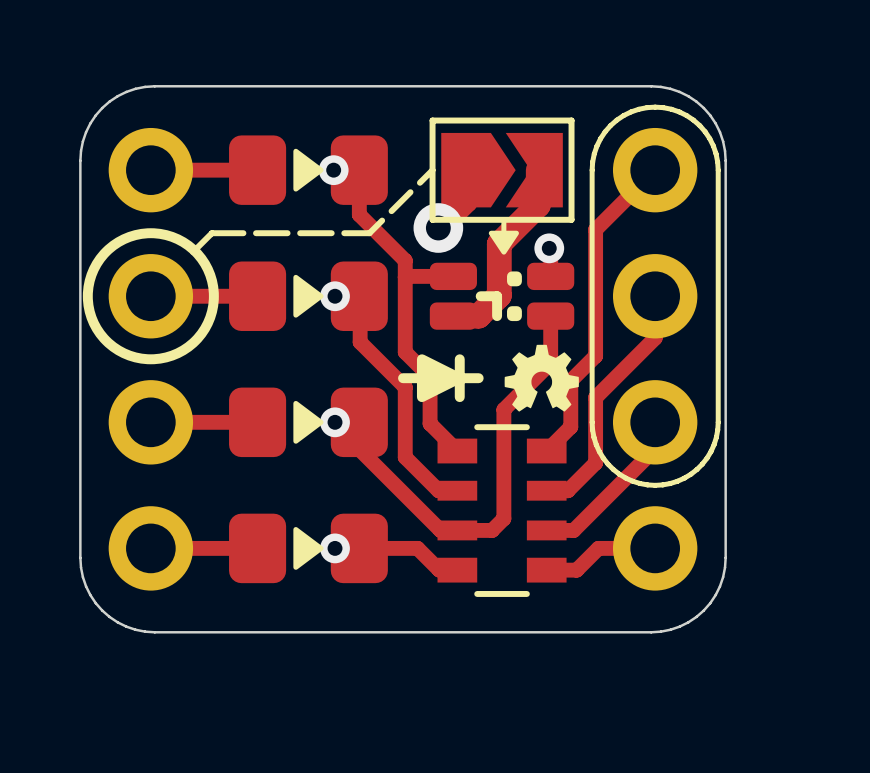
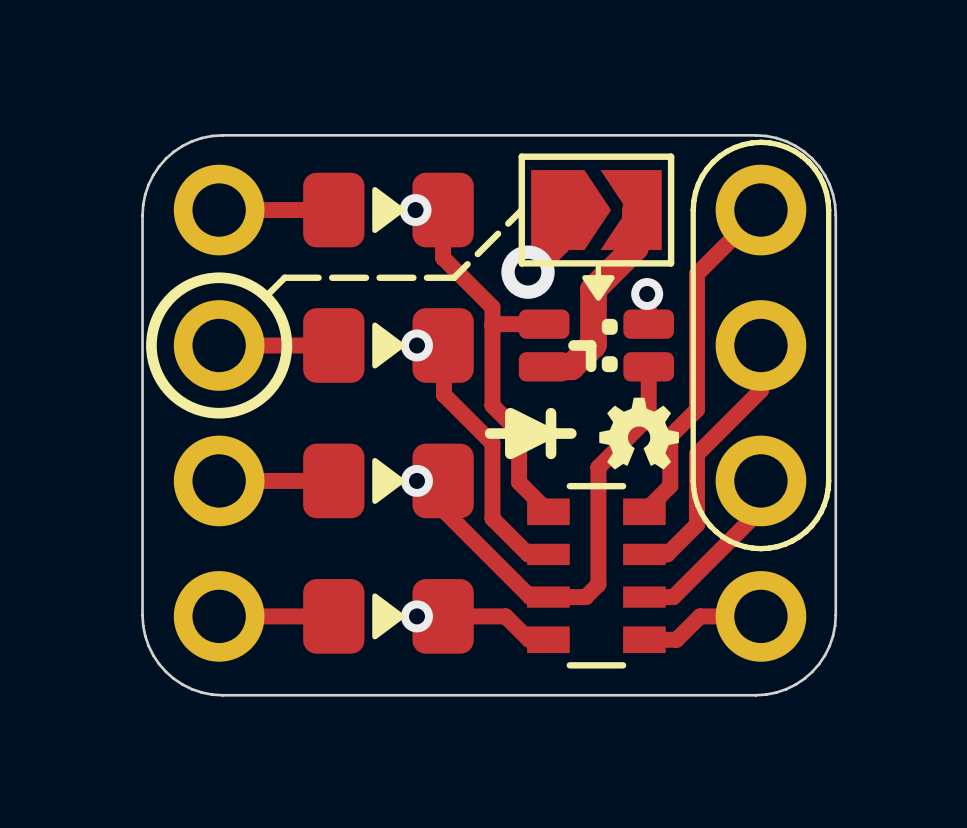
board edge: (154, 86) (135, 88) (109, 101) (90, 123) (81, 151) (80, 557) (86, 586) (102, 610) (126, 626) (154, 632) (651, 632) (679, 626) (703, 610) (719, 586) (725, 557) (725, 160) (719, 132) (703, 108) (679, 91) (651, 86) (154, 86) -> (222, 135) (201, 138) (173, 151) (153, 175) (143, 204) (142, 615) (148, 645) (165, 671) (191, 689) (222, 695) (755, 695) (786, 689) (812, 671) (829, 645) (835, 615) (835, 215) (829, 184) (812, 158) (786, 141) (755, 135) (222, 135)

